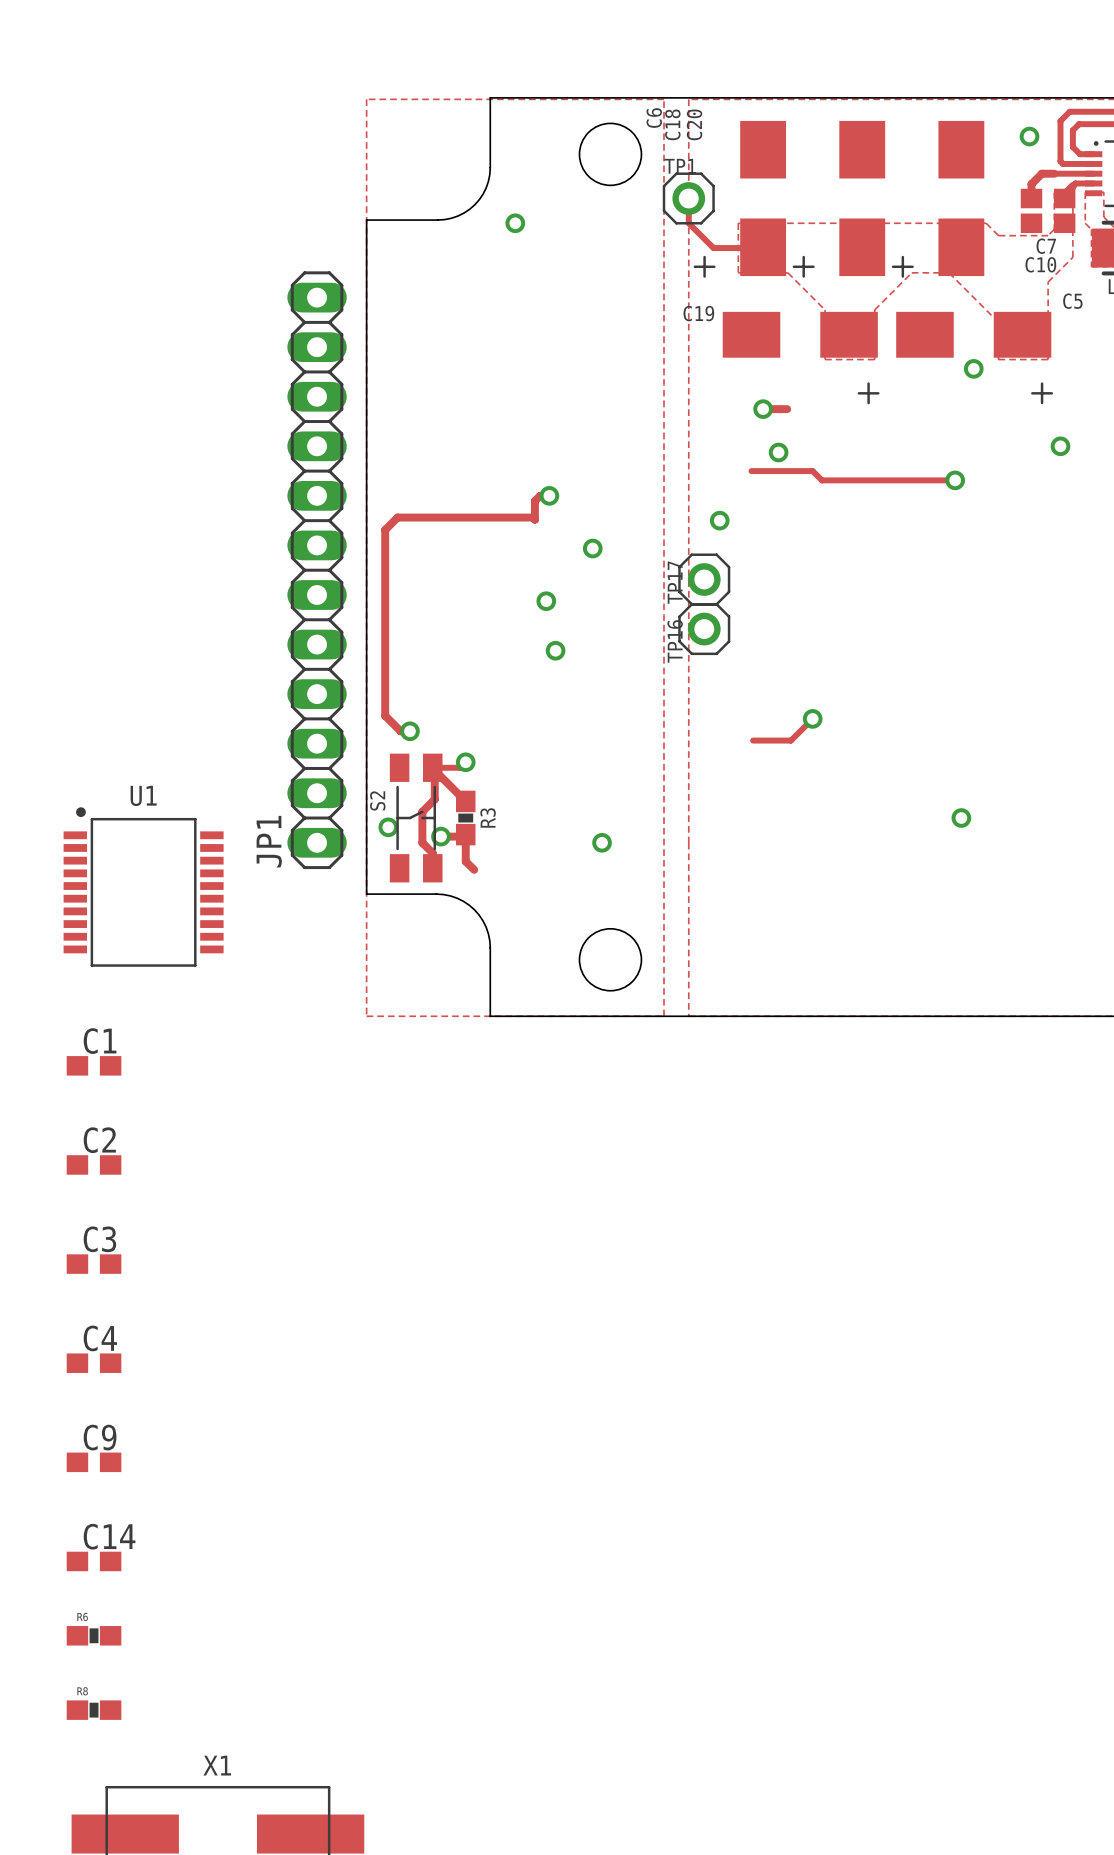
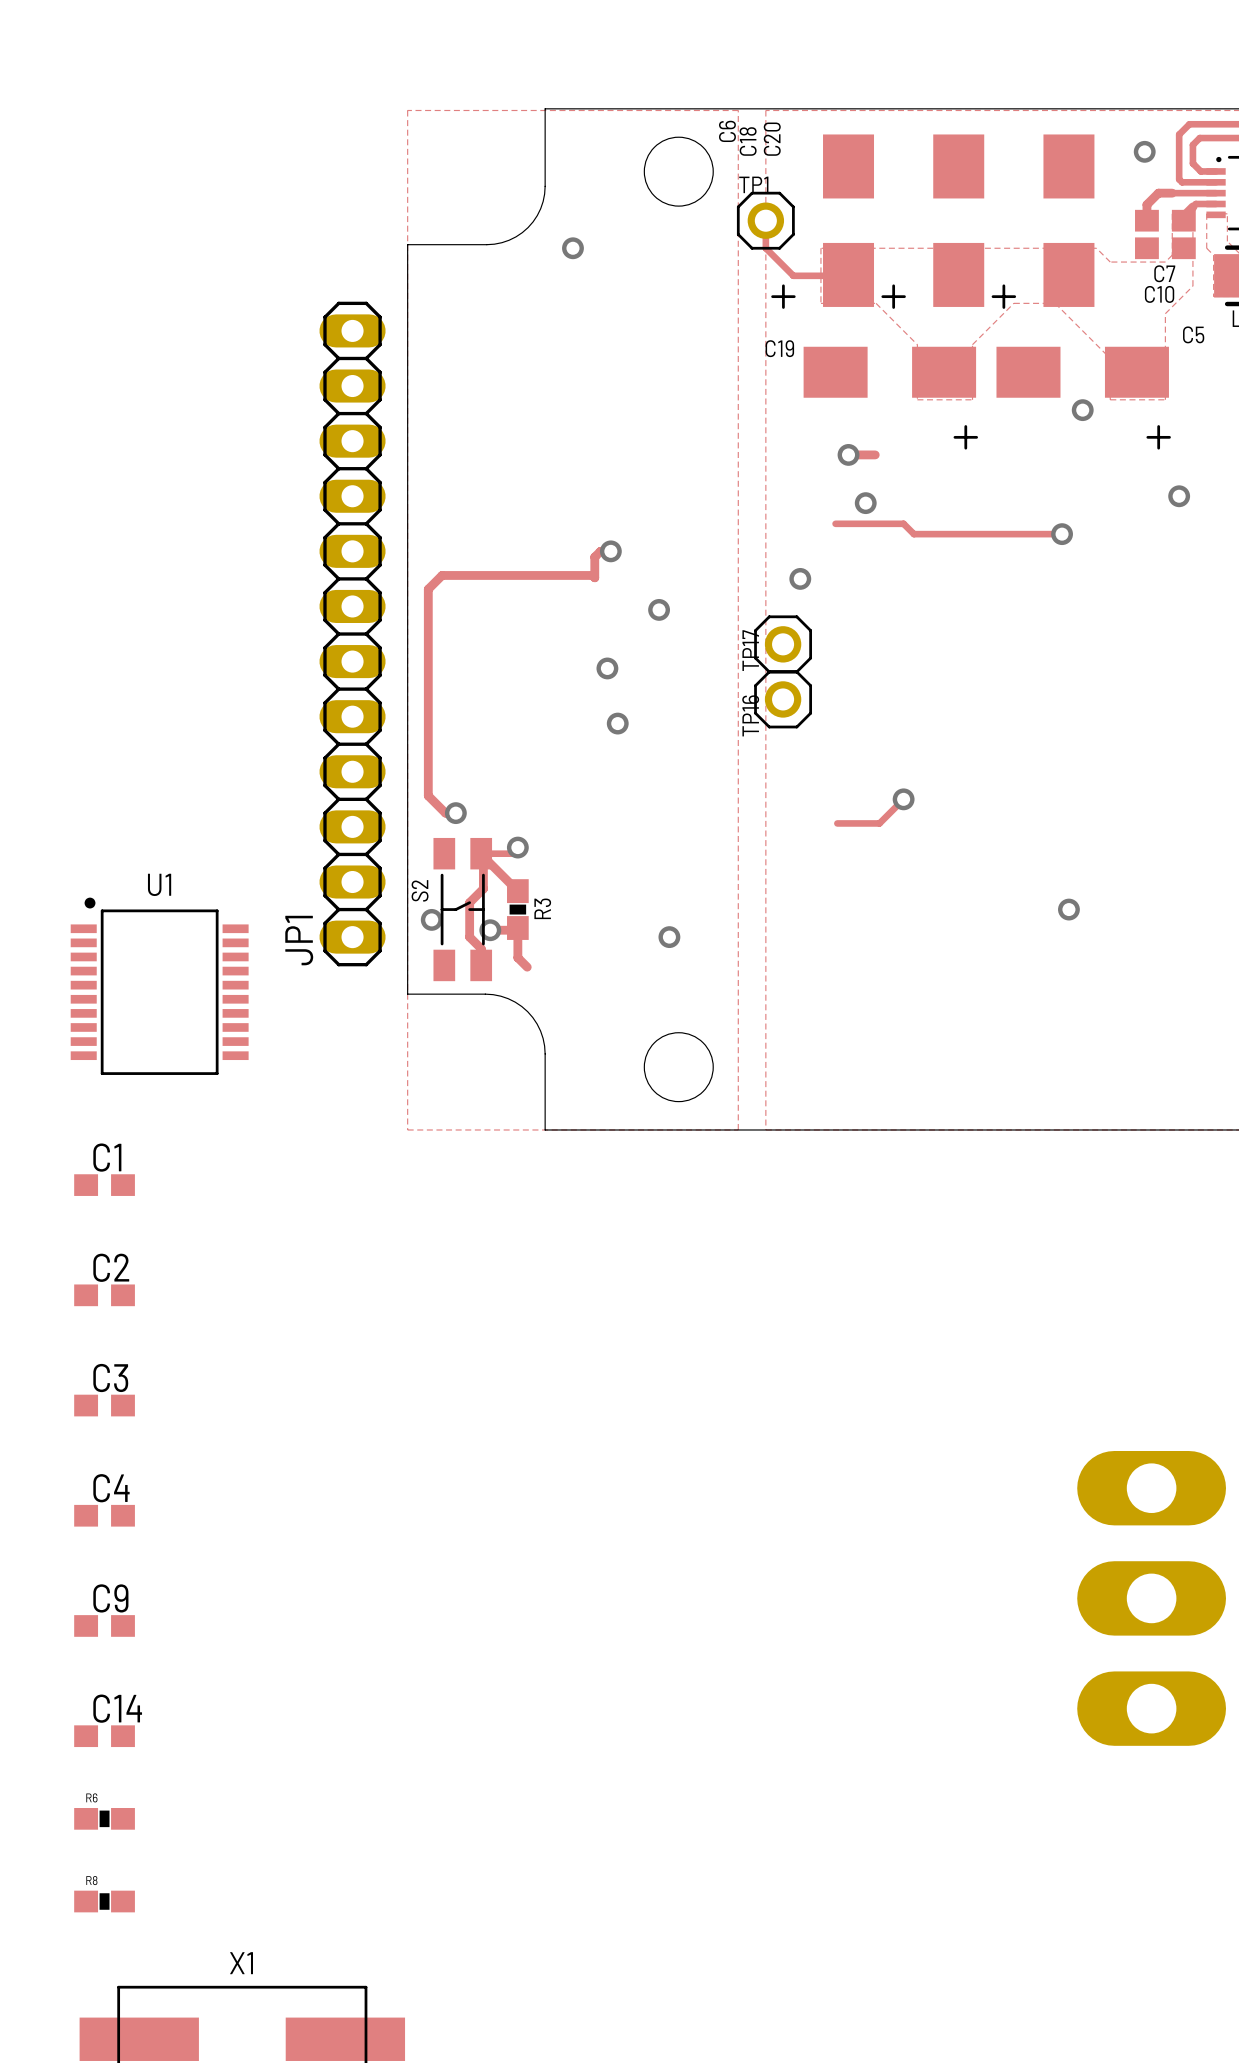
part: none -> (1151, 1488)
part: none -> (1151, 1598)
part: none -> (1151, 1708)

